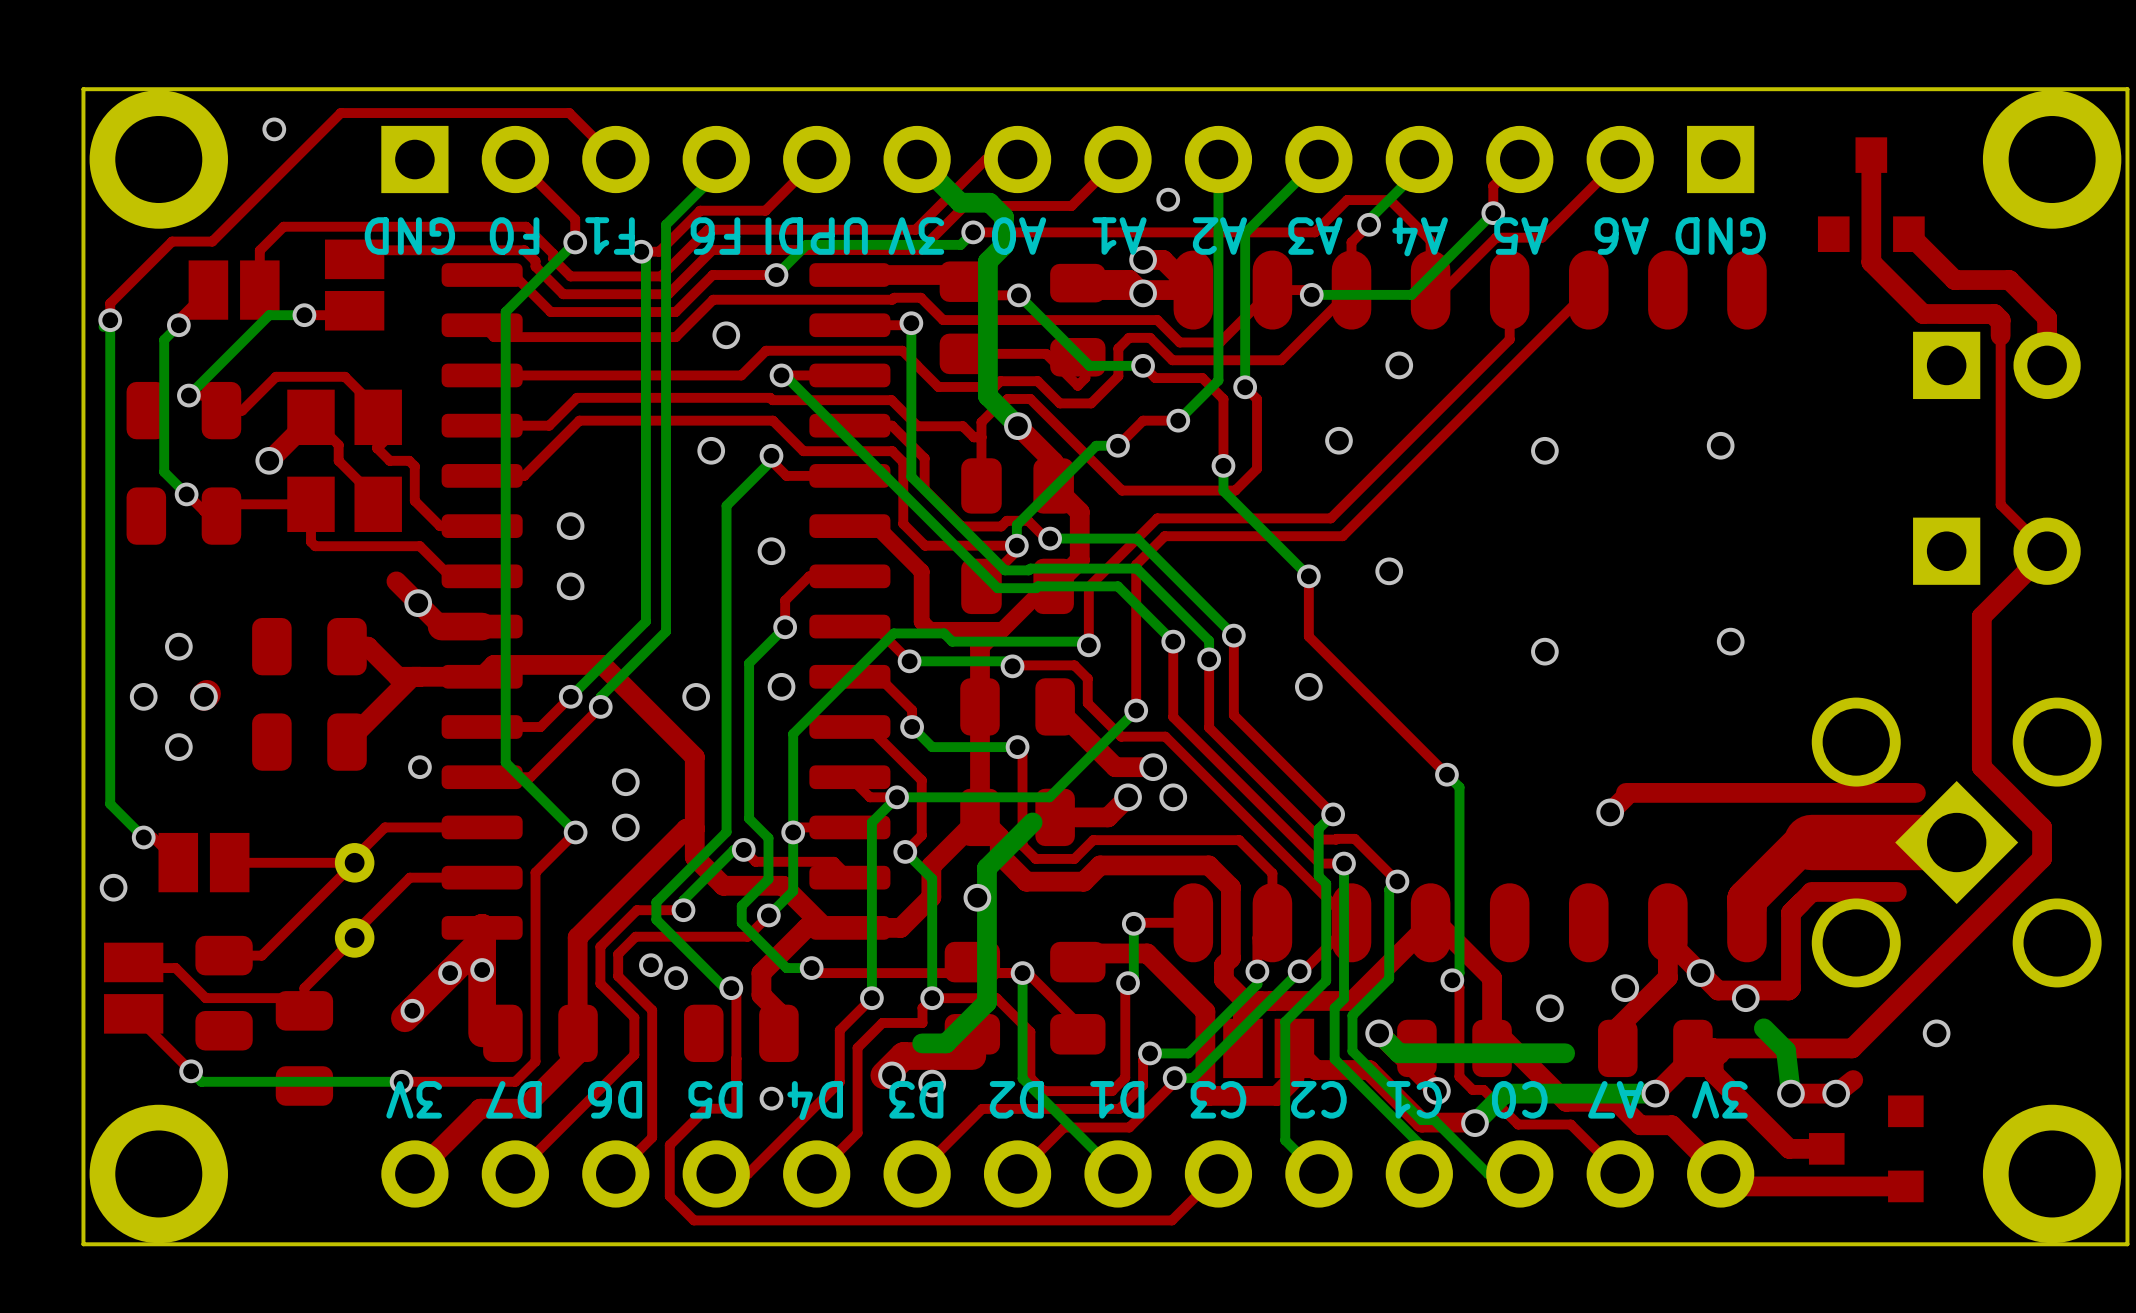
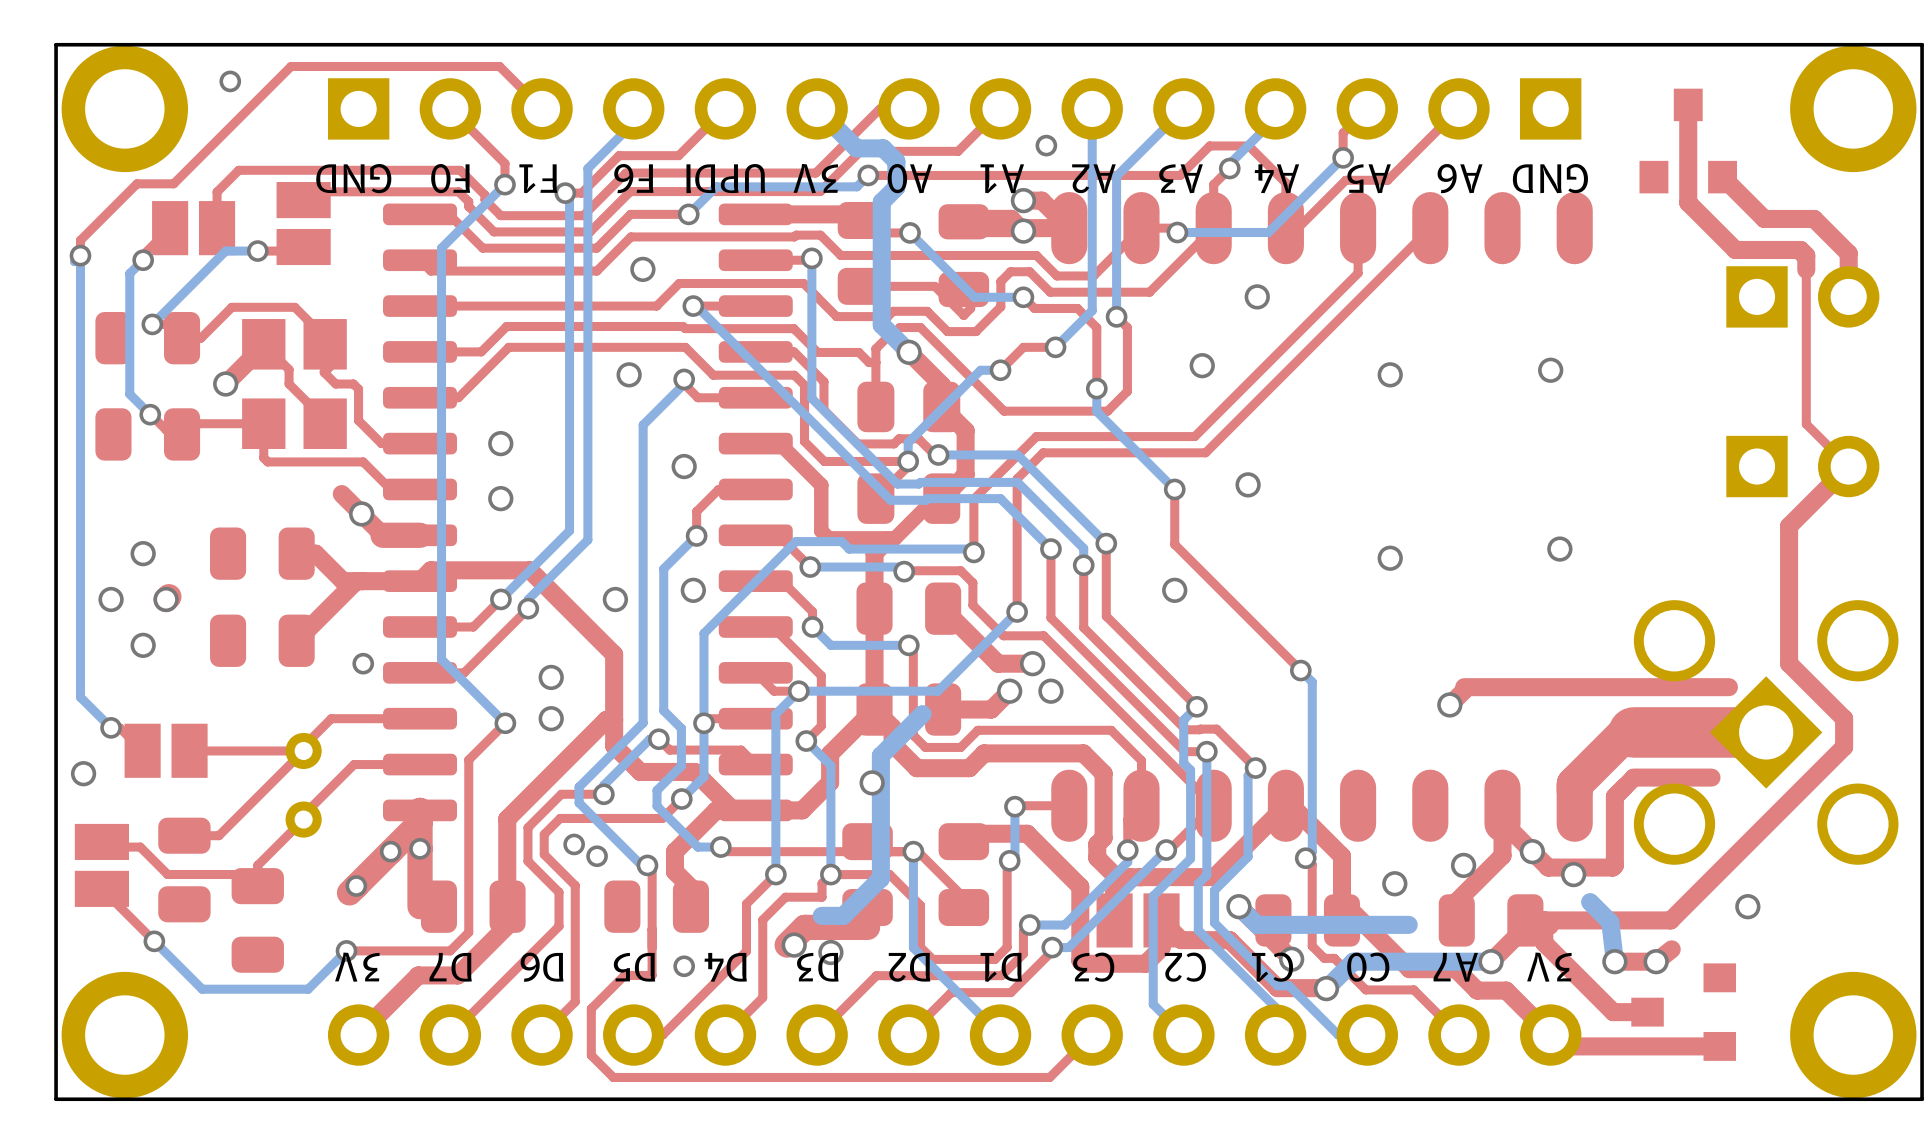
bottom track: (401, 1081) (201, 1081) -> (346, 950) (308, 989) (202, 989) (163, 950)

